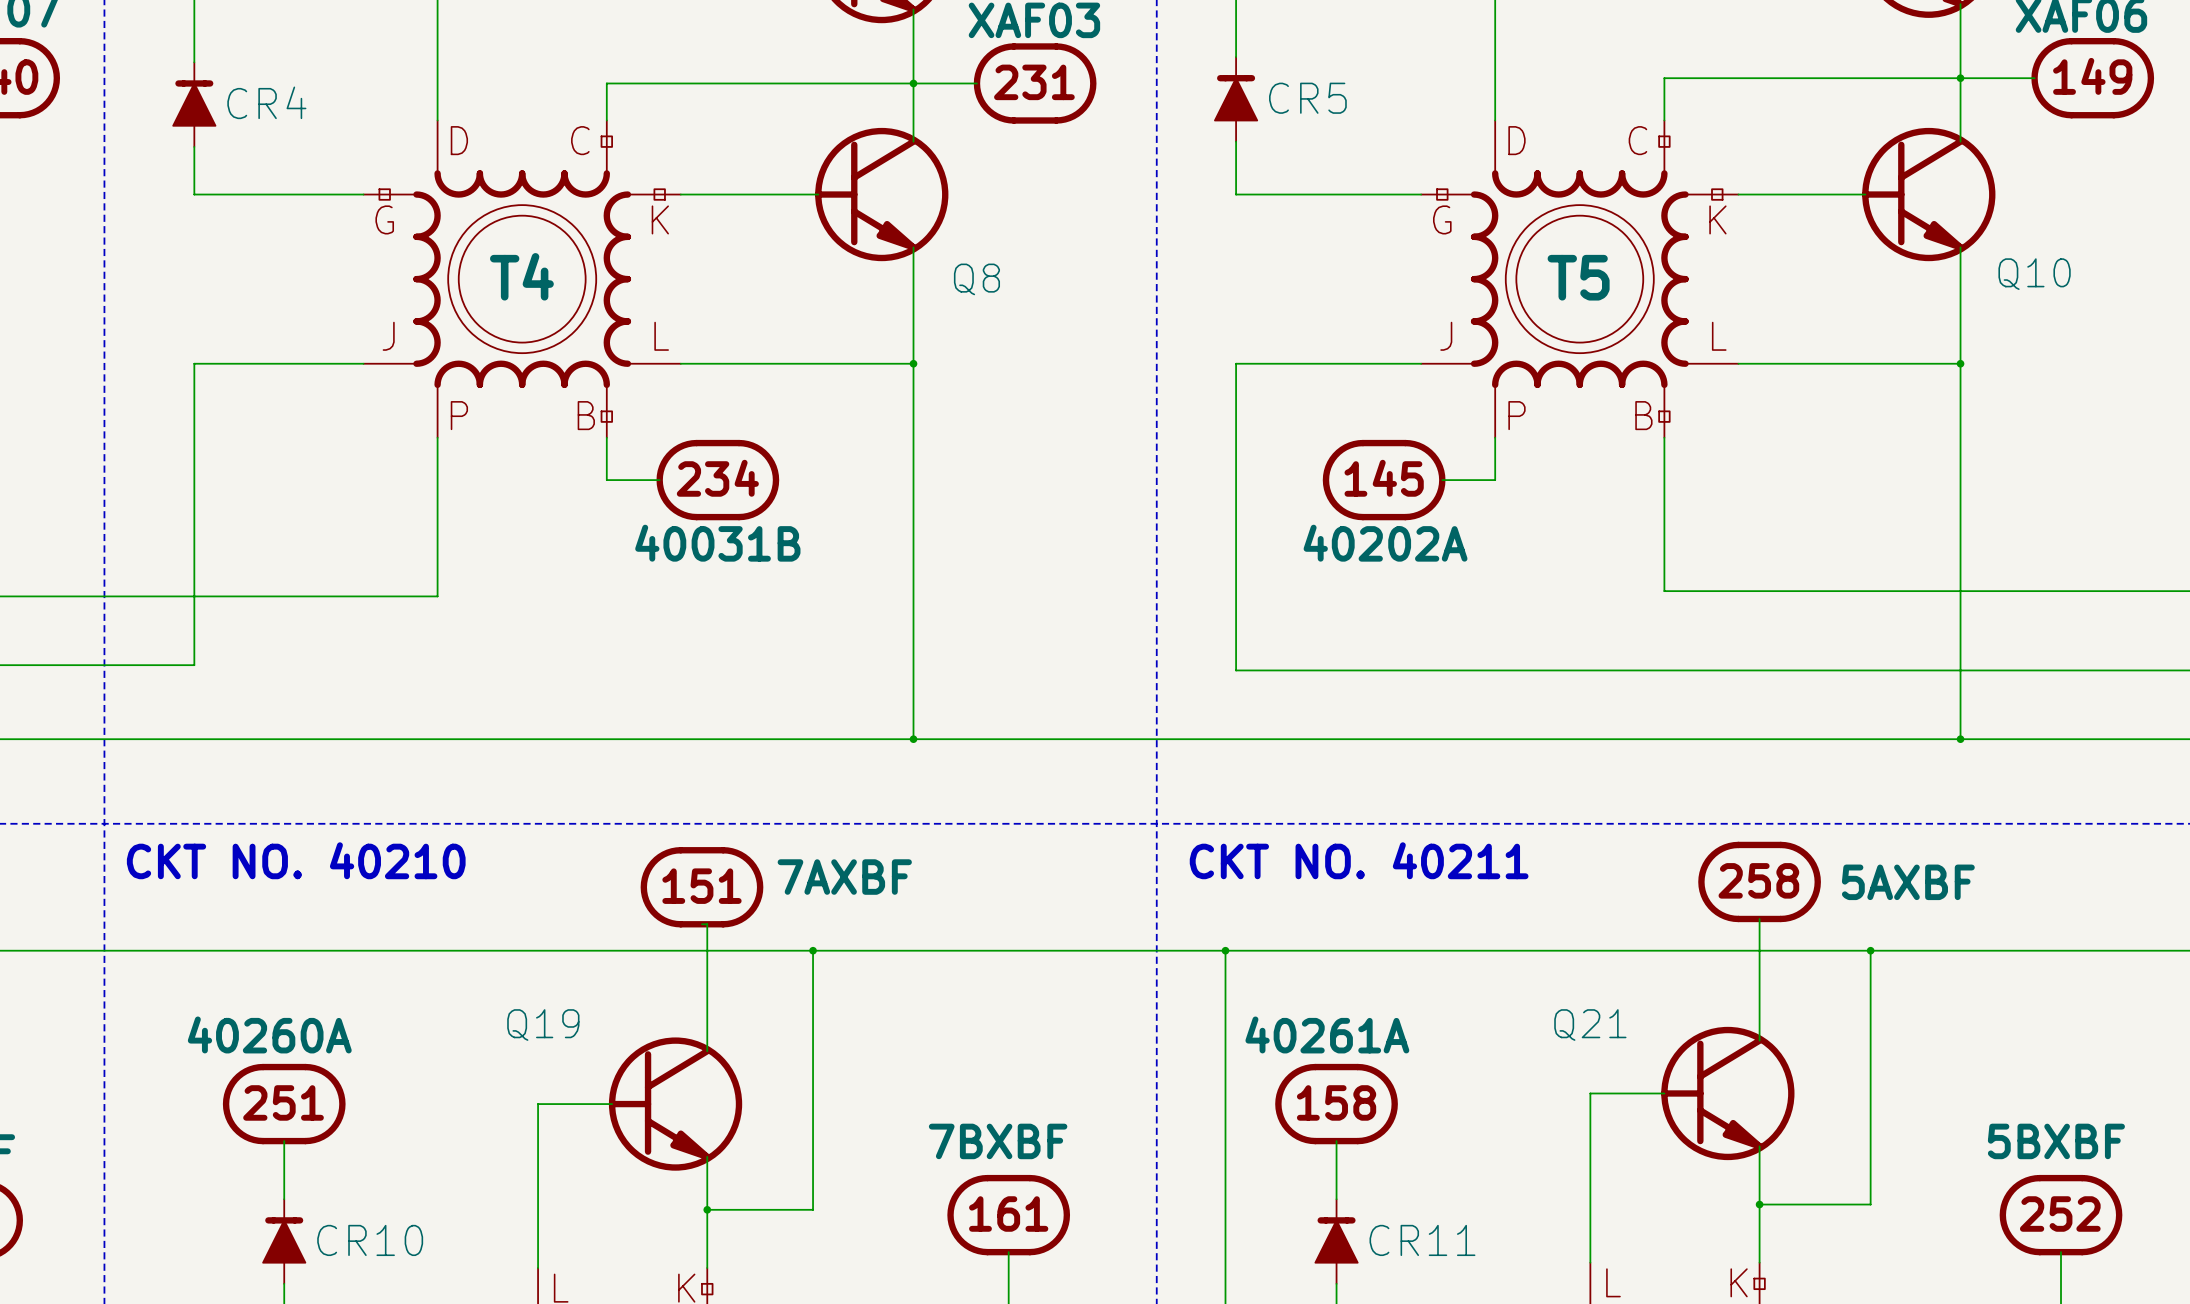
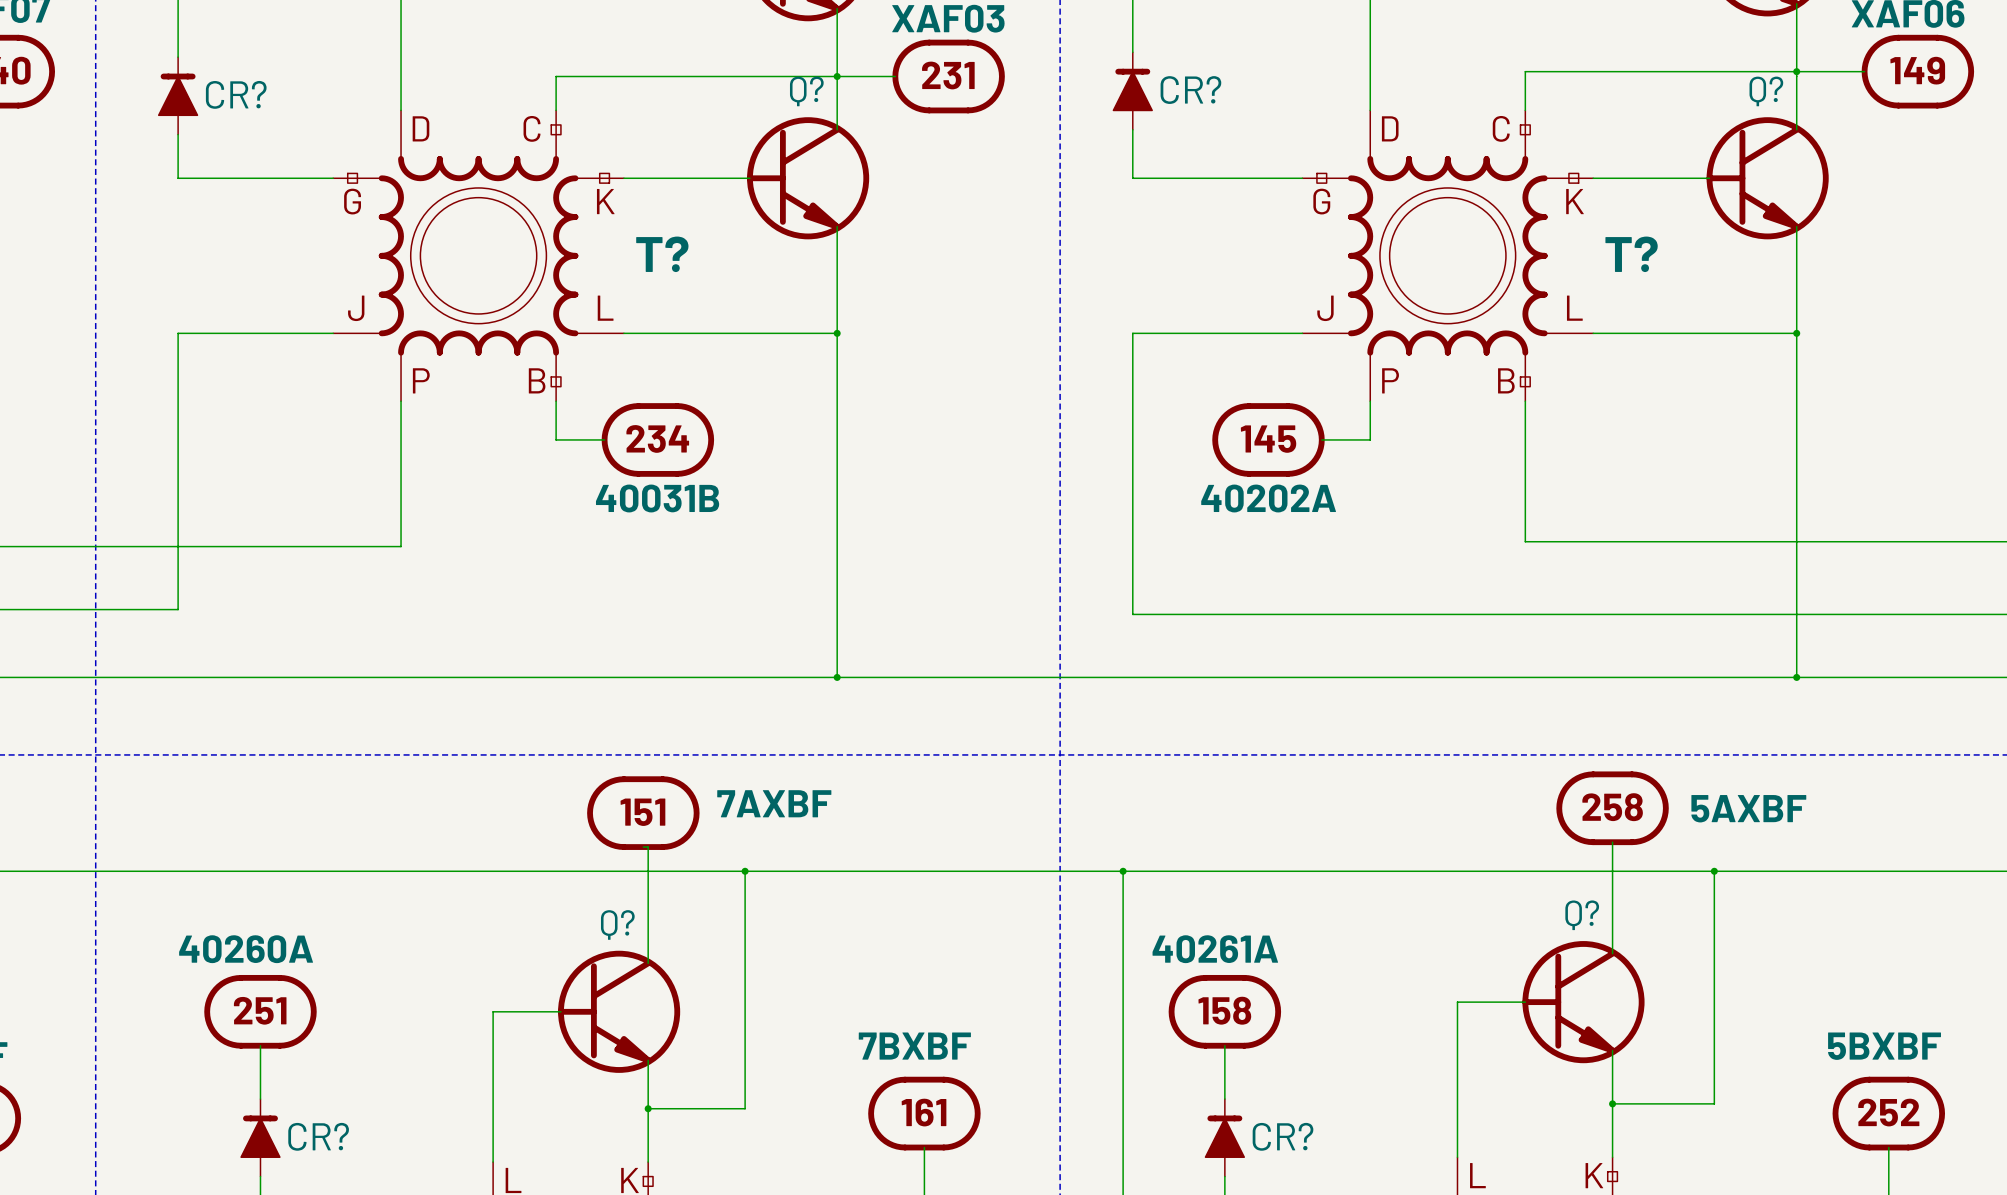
CR5 name: CR5 (1307, 98) -> CR? (1190, 90)
CR4 name: CR4 (266, 102) -> CR? (236, 94)
Q10 name: Q10 (2034, 274) -> Q? (1766, 91)
T4 name: T4 (521, 276) -> T? (662, 254)
T5 name: T5 (1578, 277) -> T? (1631, 254)
Q8 name: Q8 (976, 279) -> Q? (806, 91)
text: CKT NO. 40210 (296, 860) -> none
text: CKT NO. 40211 (1359, 860) -> none
Q19 name: Q19 (543, 1025) -> Q? (617, 924)
Q21 name: Q21 (1590, 1025) -> Q? (1582, 915)
CR10 name: CR10 (370, 1240) -> CR? (318, 1136)
CR11 name: CR11 (1422, 1240) -> CR? (1283, 1136)

